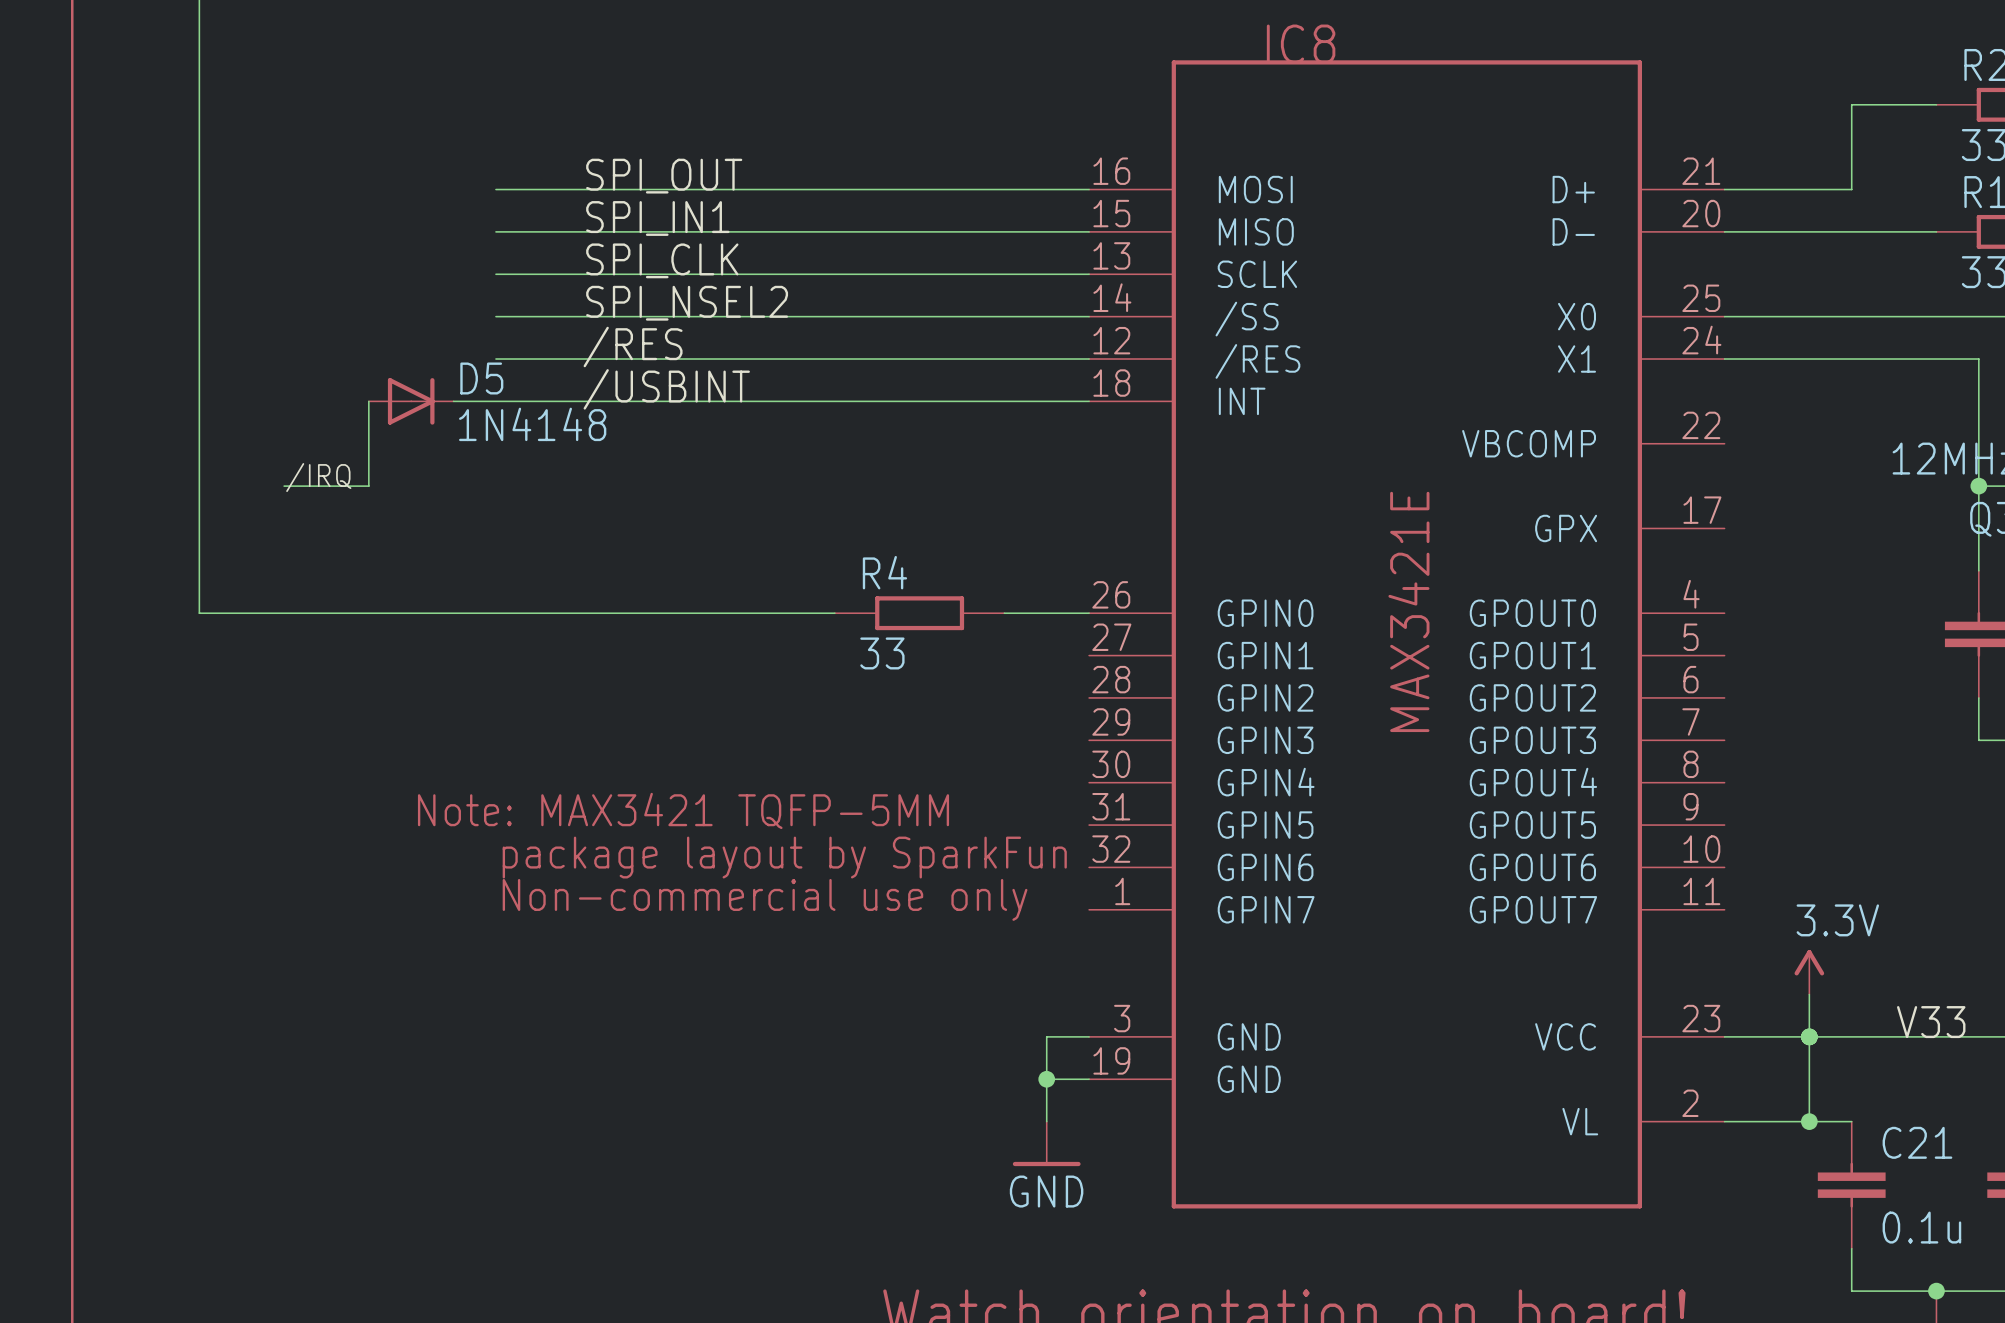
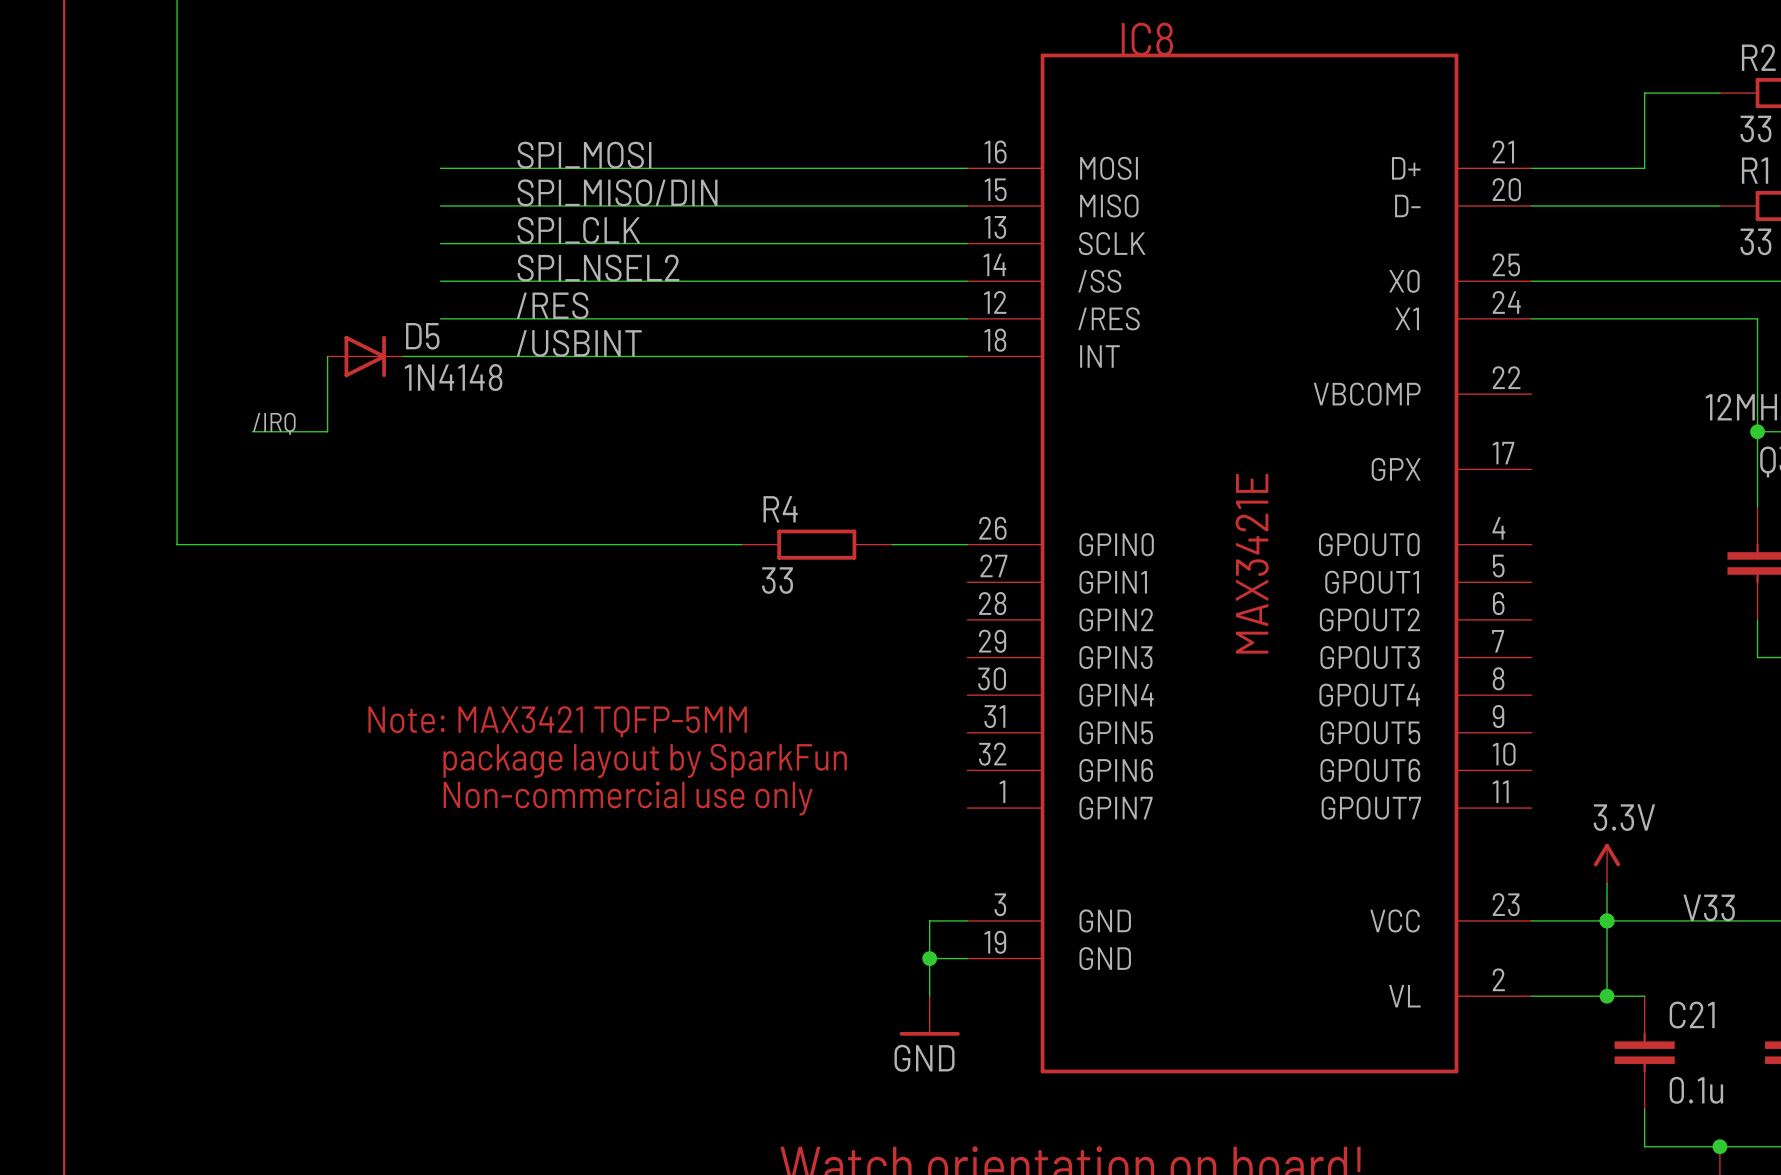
label: SPI_OUT (664, 176) -> SPI_MOSI (584, 155)
label: SPI_IN1 (657, 218) -> SPI_MISO/DIN (617, 192)

